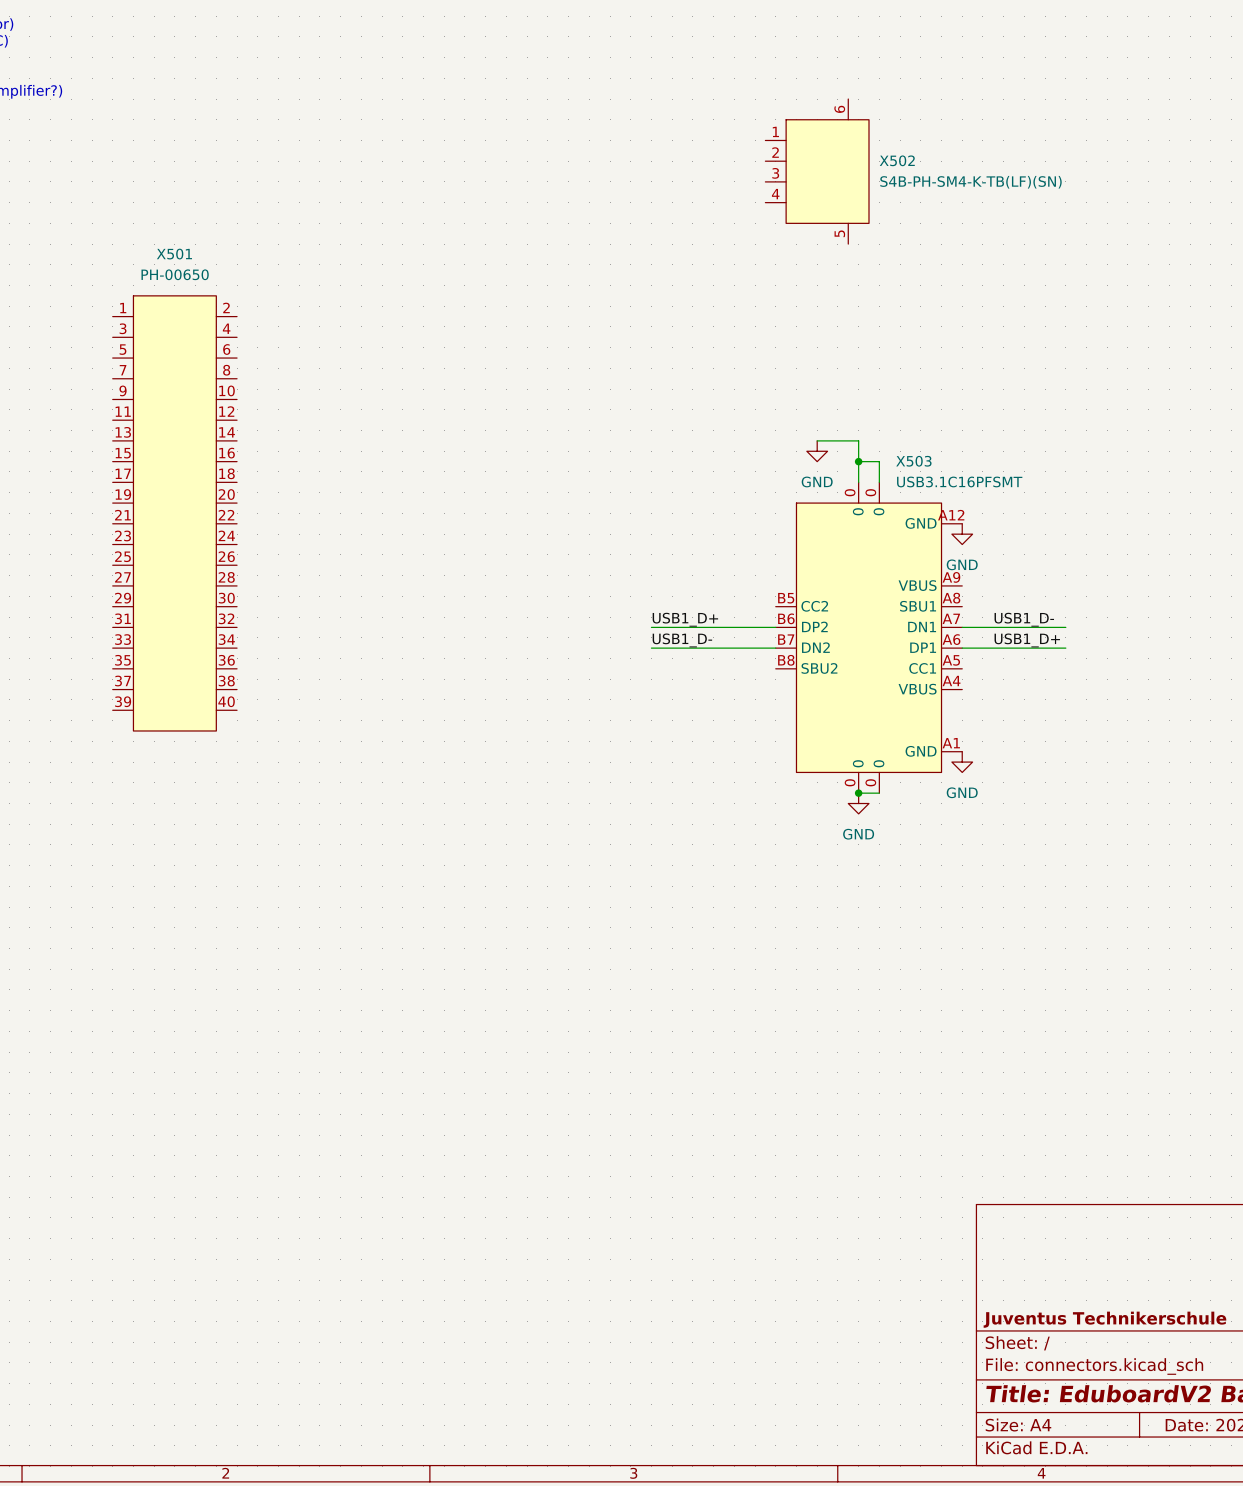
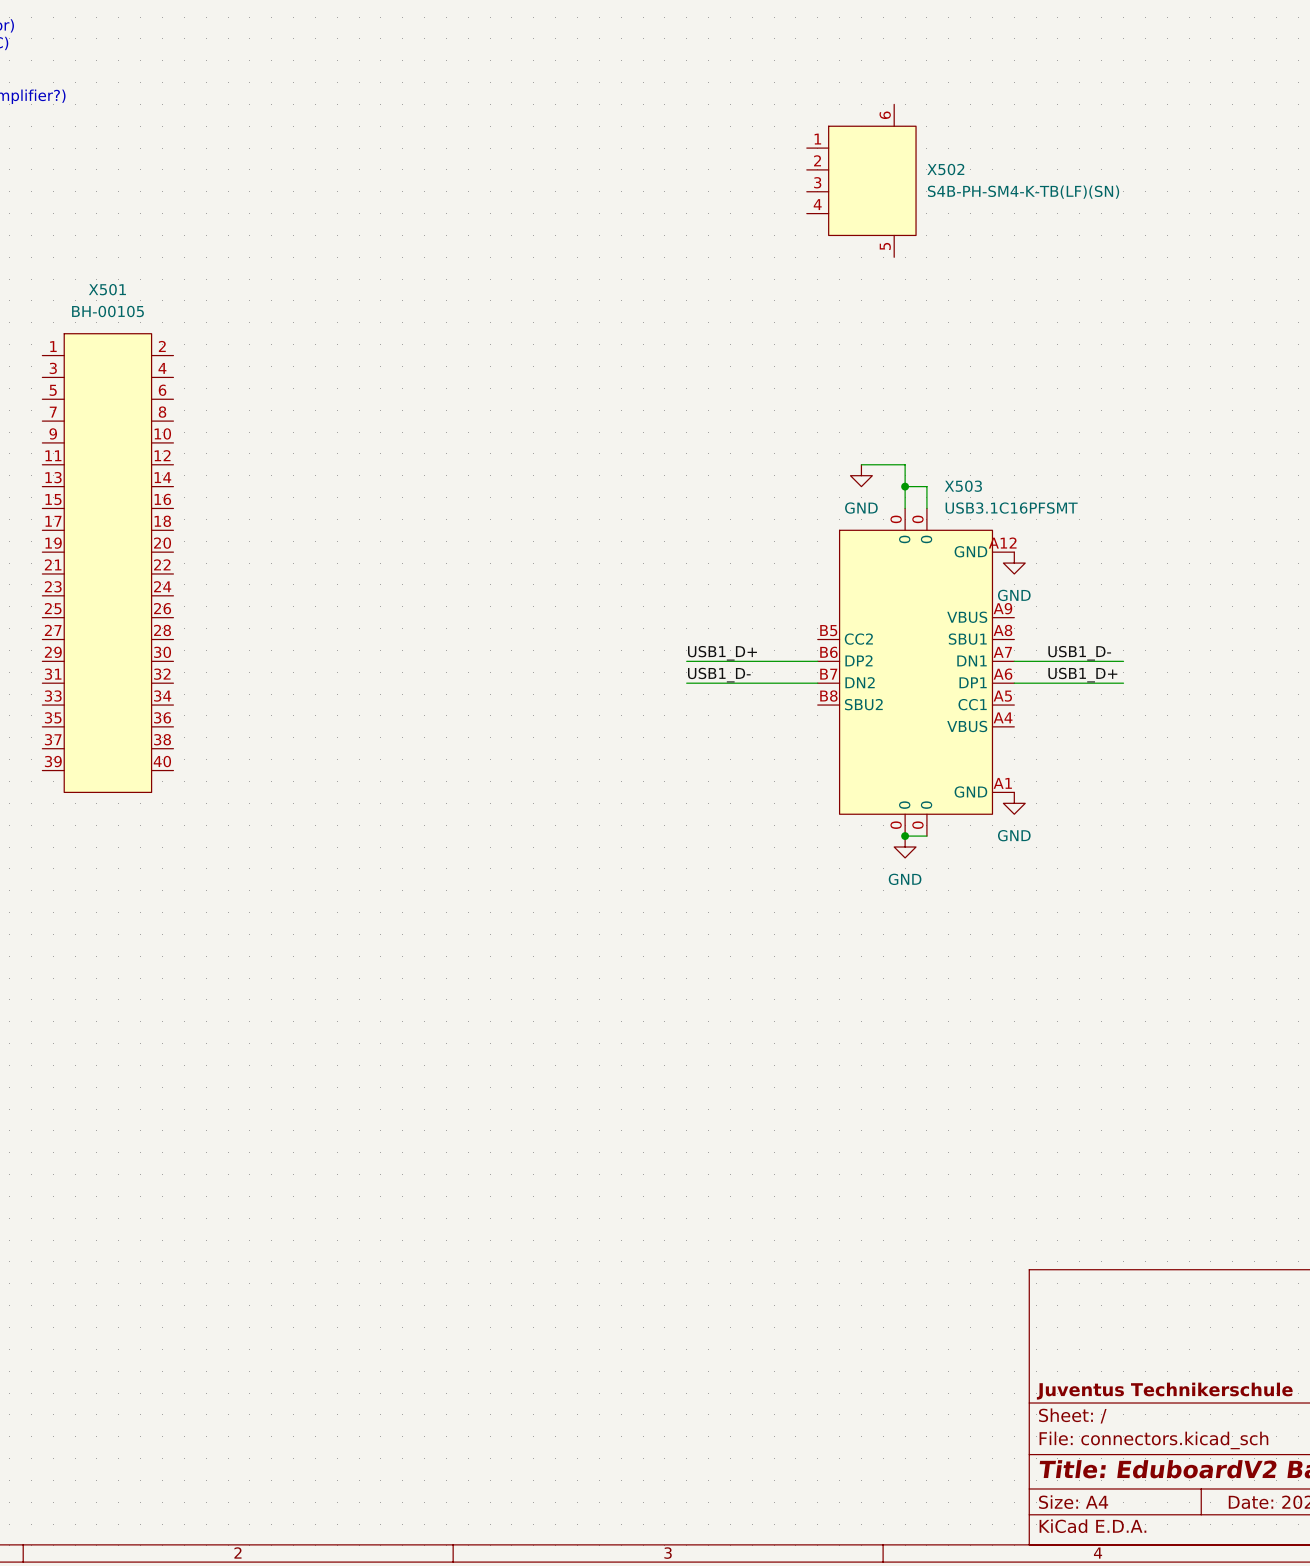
X501 value: PH-00650 (175, 274) -> BH-00105 (107, 311)
X501 position: (174, 513) -> (107, 563)

